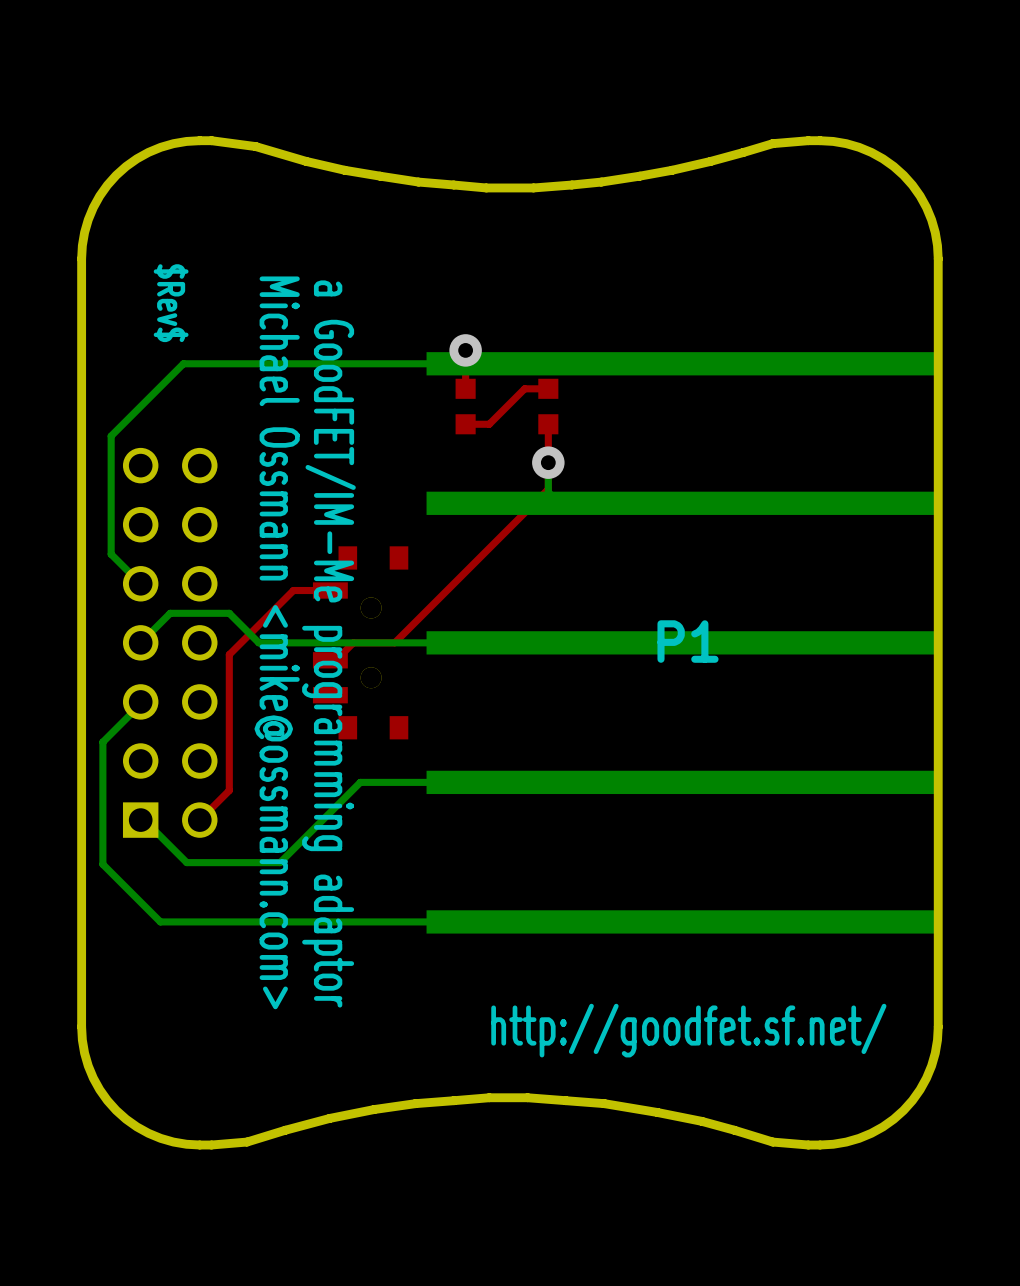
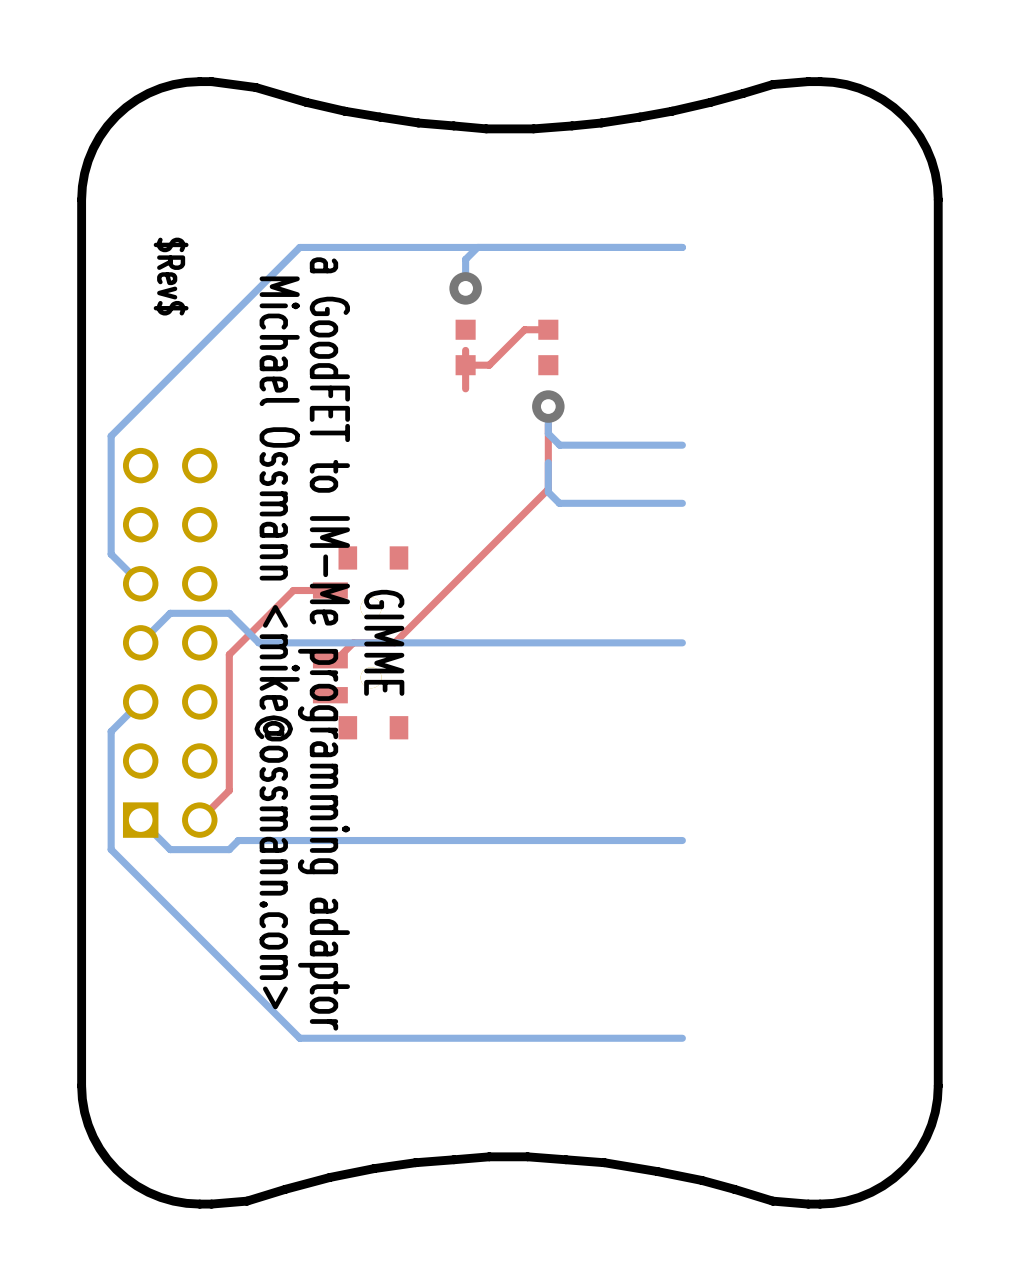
bottom track: none -> (477, 247) (465, 259) (465, 288)
board edge: (938, 258) (935, 232) (926, 207) (903, 175) (871, 152) (846, 143) (820, 140) (772, 143) (710, 161) (639, 176) (601, 182) (533, 187) (486, 187) (418, 182) (344, 170) (255, 146) (211, 140) (186, 141) (148, 152) (126, 166) (107, 185) (88, 219) (81, 258) -> (938, 258) (937, 186) (931, 160) (920, 136) (903, 116) (871, 93) (846, 84) (820, 81) (772, 84) (710, 102) (639, 117) (601, 122) (533, 128) (486, 128) (418, 122) (344, 111) (255, 87) (211, 81) (173, 84) (148, 93) (126, 107) (107, 126) (93, 148) (82, 186) (81, 258)
via: none -> (465, 288)
text position: $Rev$ (171, 303) -> $Rev$ (171, 276)
part: none -> (465, 347)
part: none -> (548, 347)
via: (465, 350) -> none
bottom track: (682, 363) (183, 363) -> (682, 247) (299, 247) (183, 363)
top track: (548, 388) (524, 388) (489, 424) (465, 424) -> (548, 329) (524, 329) (489, 365) (465, 365)
part: (465, 406) -> none
bottom track: none -> (548, 406) (548, 433) (559, 445) (682, 445)
part: (548, 406) -> none
via: none -> (548, 406)
via: (548, 462) -> none
text: none -> GIMME (384, 642)
P1: (682, 642) -> none
text: a GoodFET/IM-Me programming adaptor (328, 643) -> a GoodFET to IM-Me programming adaptor (323, 643)
bottom track: (140, 701) (140, 704) (102, 742) (102, 864) (160, 921) (682, 921) -> (140, 701) (111, 731) (111, 849) (299, 1038) (682, 1038)
bottom track: (682, 782) (360, 782) (280, 862) (186, 862) (144, 820) (140, 820) -> (682, 840) (238, 840) (229, 849) (170, 849) (140, 820)
board edge: (938, 1026) (935, 1053) (926, 1078) (903, 1110) (882, 1126) (859, 1138) (820, 1145) (772, 1142) (701, 1121) (604, 1103) (527, 1097) (489, 1097) (415, 1103) (329, 1118) (247, 1142) (211, 1145) (186, 1144) (148, 1133) (116, 1110) (99, 1089) (88, 1065) (81, 1026) -> (938, 1026) (937, 1099) (931, 1124) (920, 1148) (903, 1169) (871, 1192) (846, 1201) (820, 1204) (772, 1201) (701, 1180) (604, 1162) (527, 1156) (489, 1156) (415, 1162) (374, 1168) (329, 1177) (247, 1201) (199, 1204) (173, 1201) (148, 1192) (126, 1178) (107, 1159) (93, 1137) (82, 1099) (81, 1026)
text: http://goodfet.sf.net/ (688, 1030) -> none

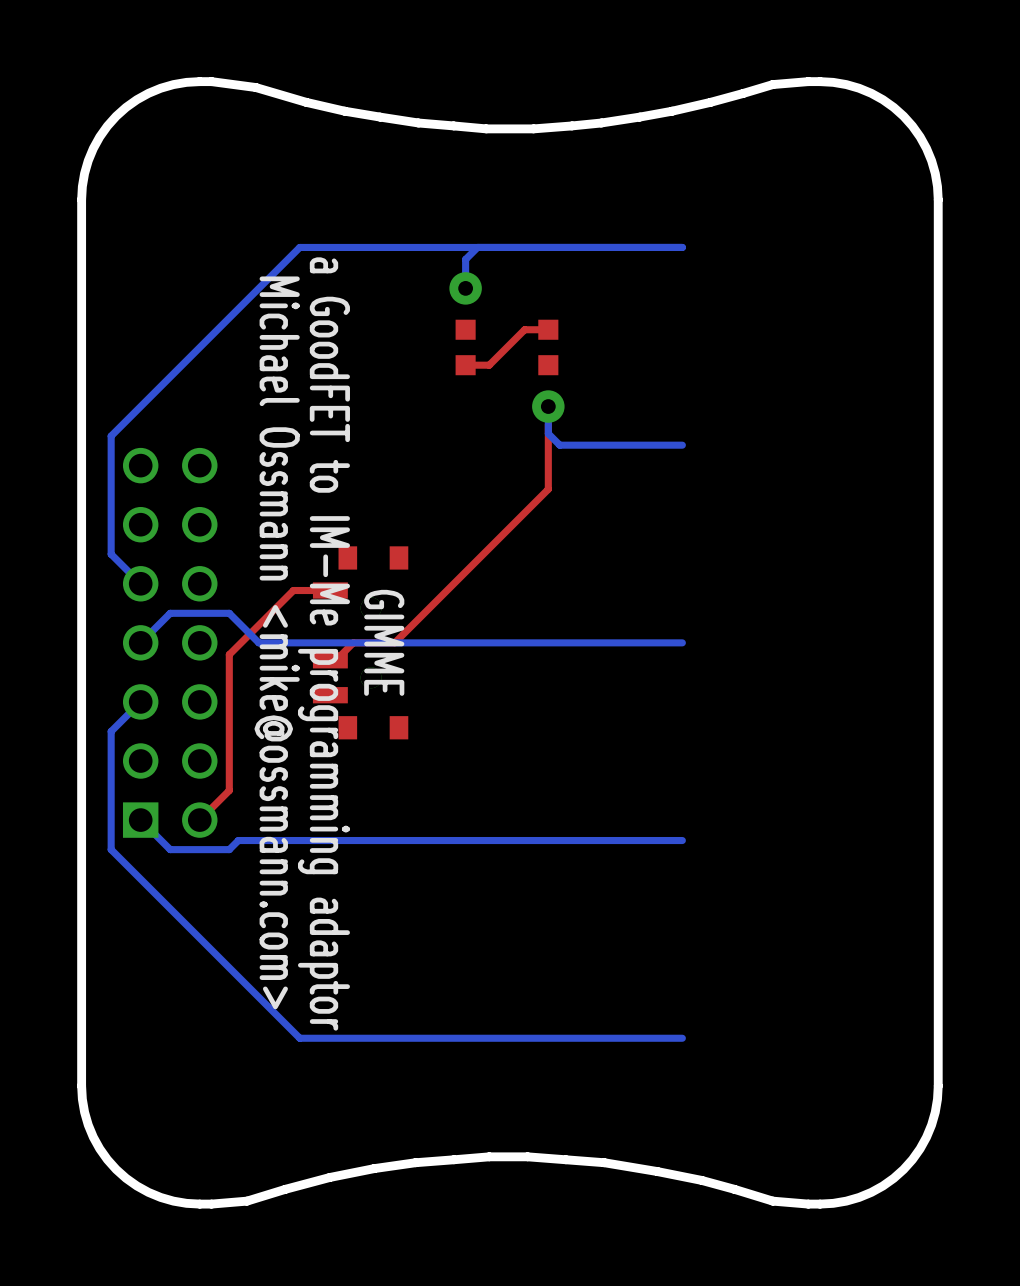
text: $Rev$ (171, 276) -> none
top track: (465, 350) (465, 388) -> none
bottom track: (548, 462) (548, 492) (559, 503) (682, 503) -> none

